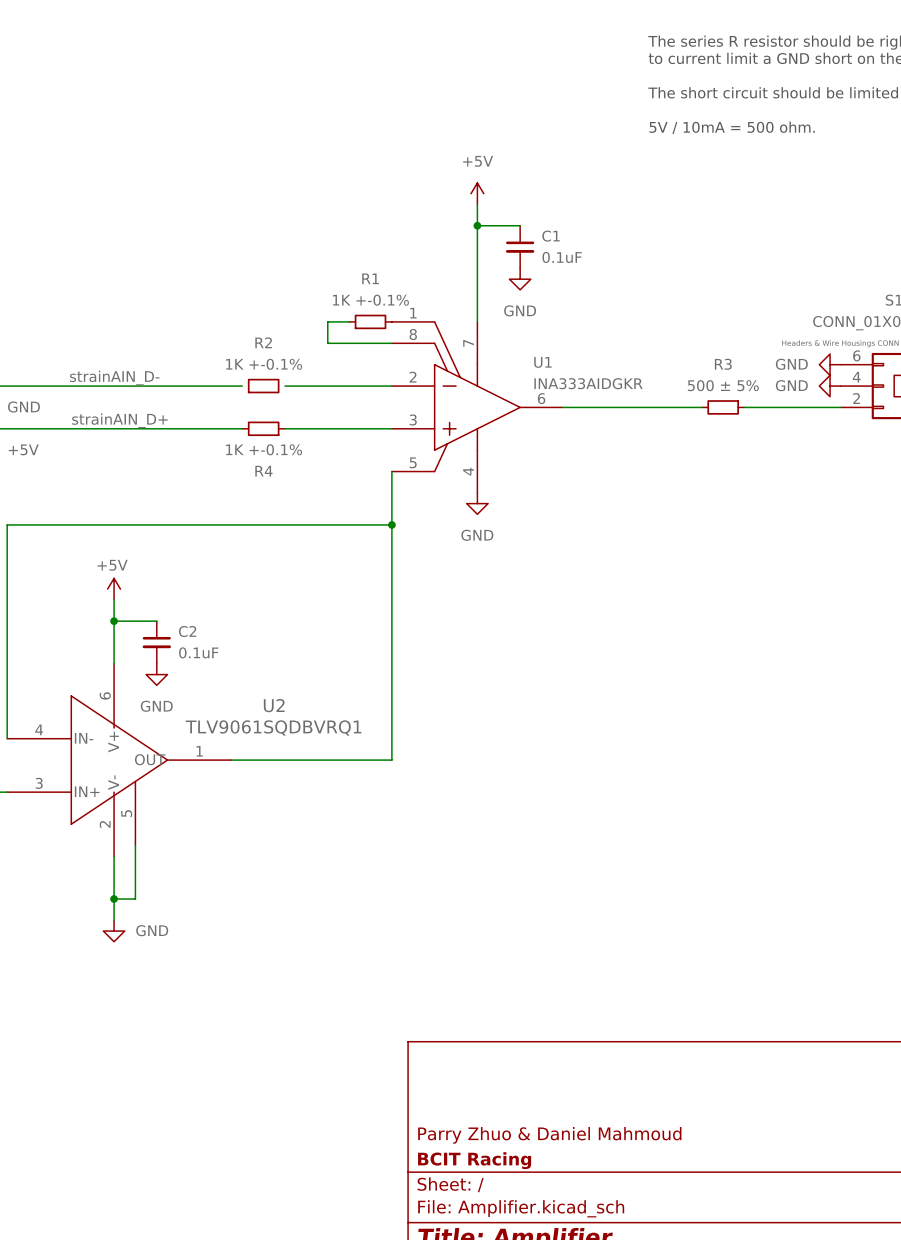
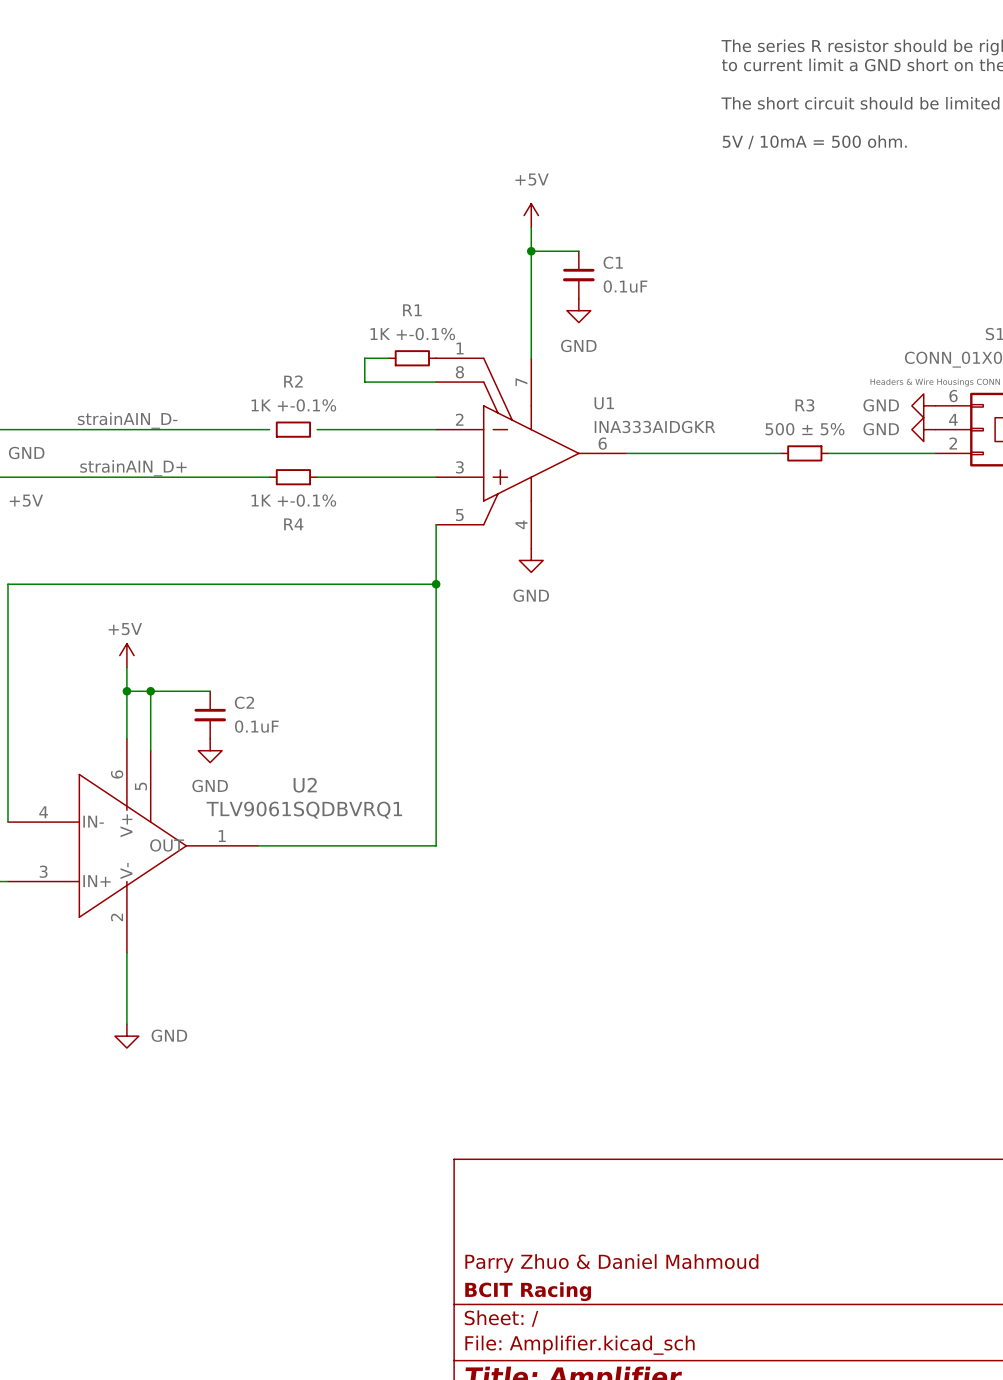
wire: none -> (150, 691) (150, 750)
junction: none -> (150, 691)
wire: none -> (174, 691) (210, 691)
C2 position: (156, 642) -> (210, 715)
U2 symbol: [7, 663, 232, 857] -> [7, 738, 258, 953]
power symbol position: GND (156, 674) -> GND (210, 750)
wire: (135, 845) (135, 899) (114, 899) -> none
junction: (114, 899) -> none

